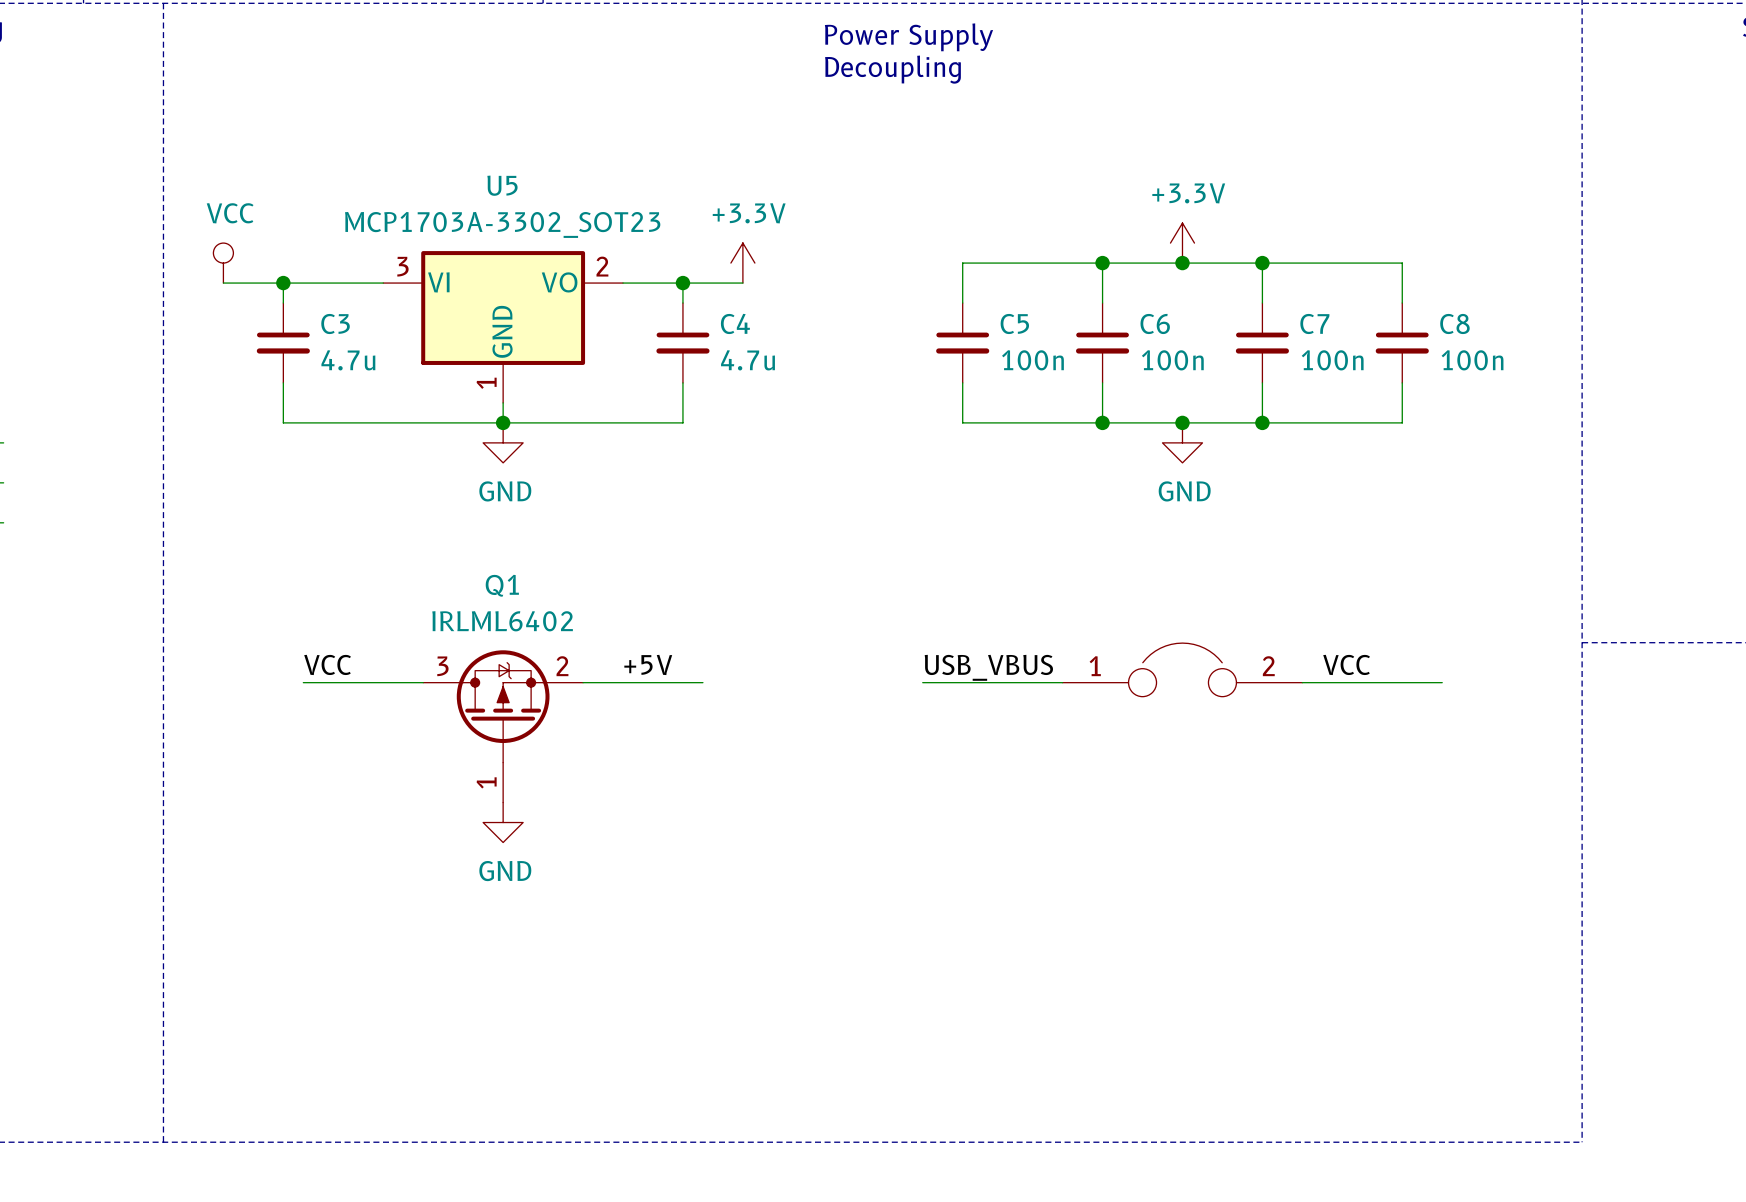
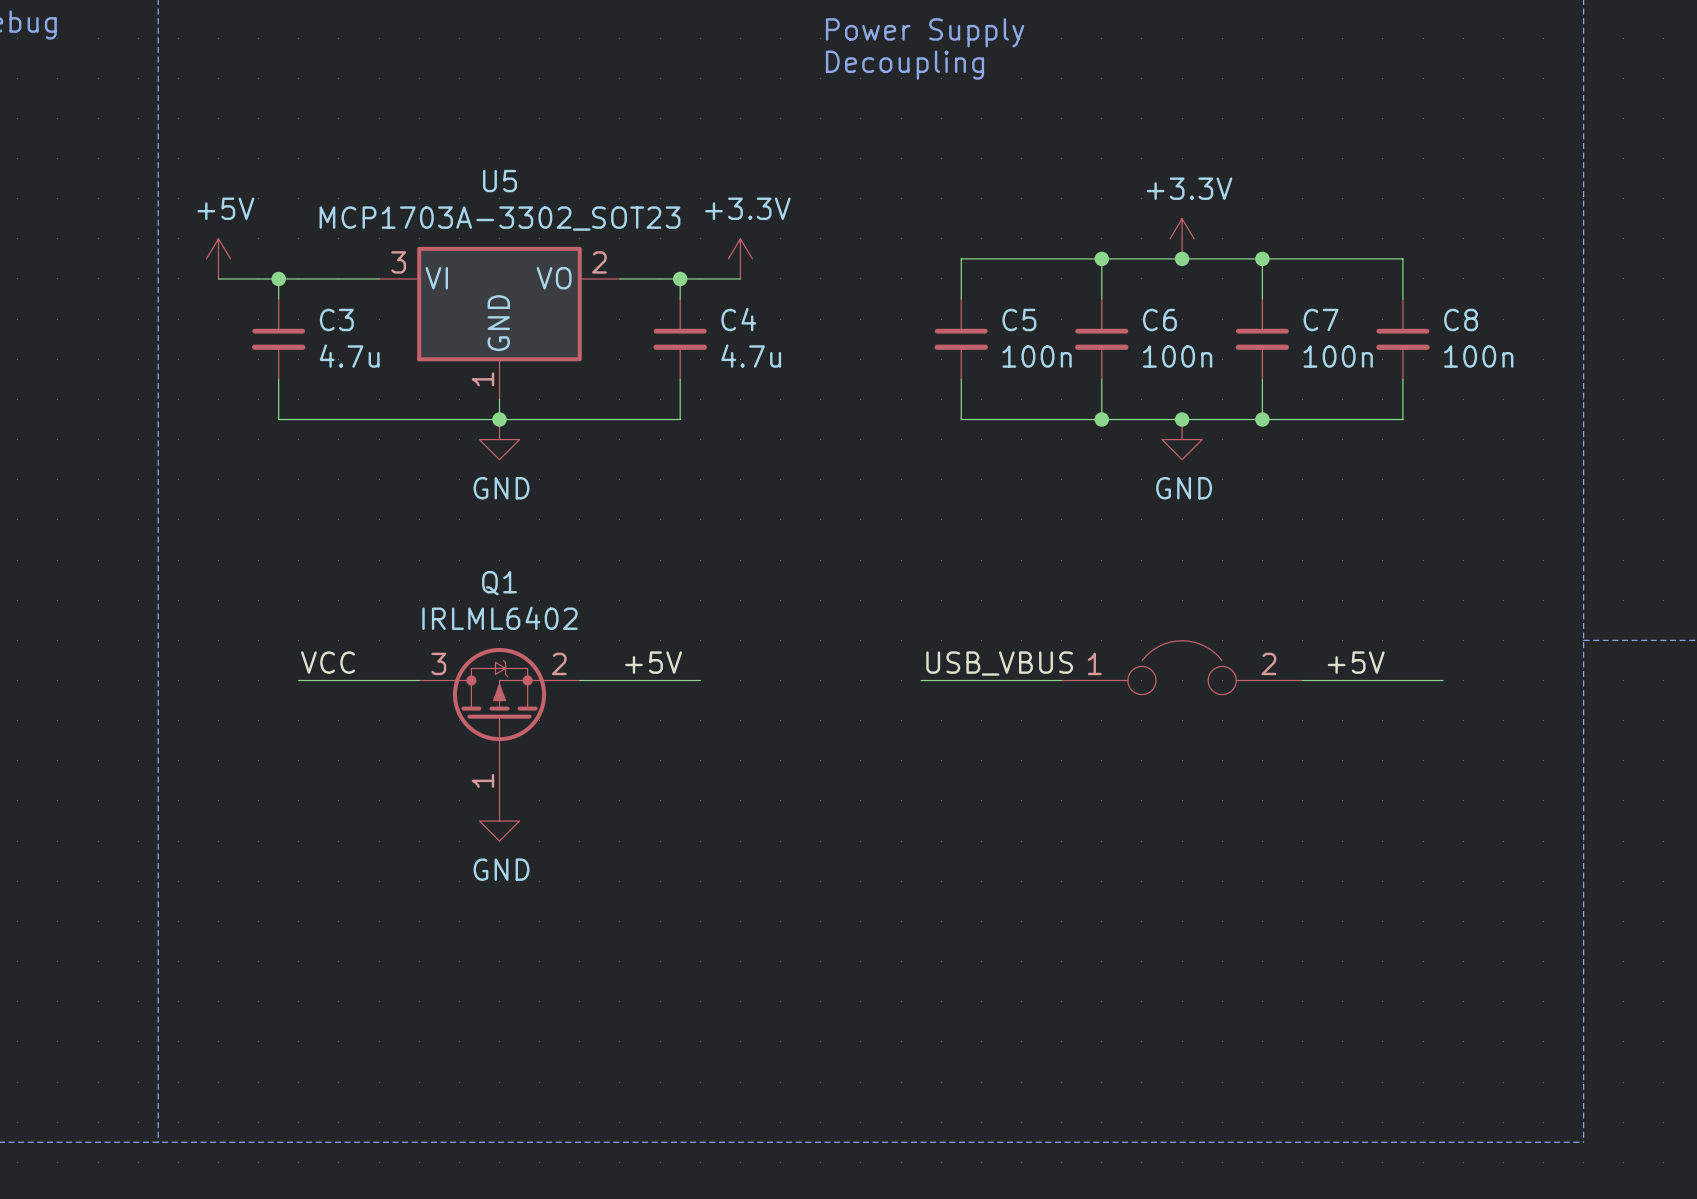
power symbol: VCC (223, 263) -> +5V (218, 258)
label: VCC (1346, 664) -> +5V (1356, 662)

